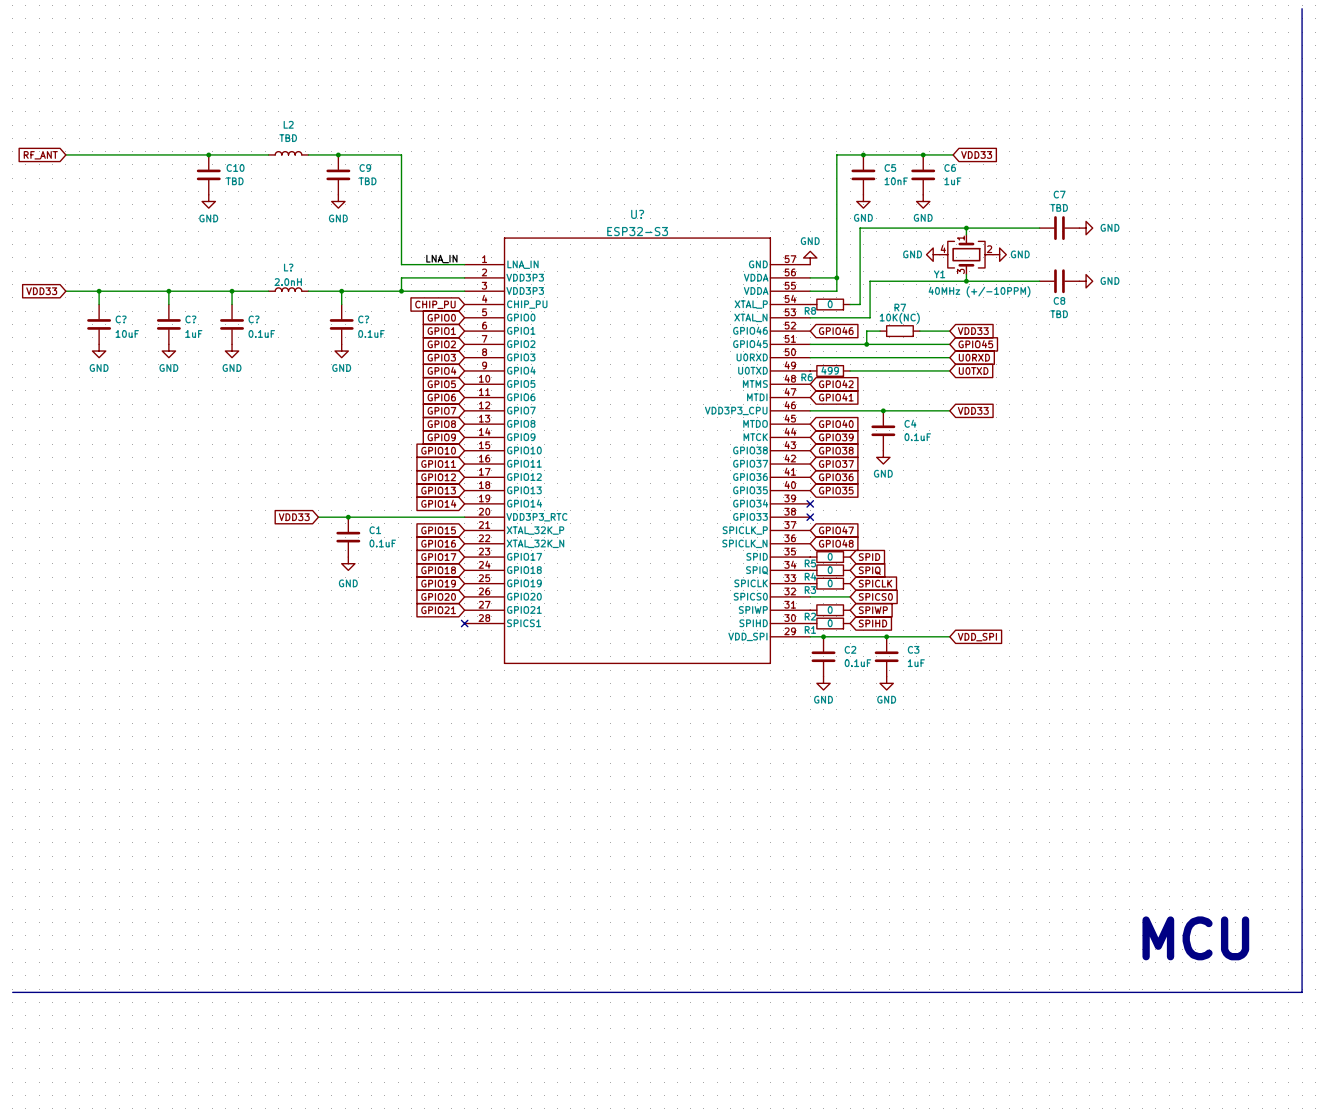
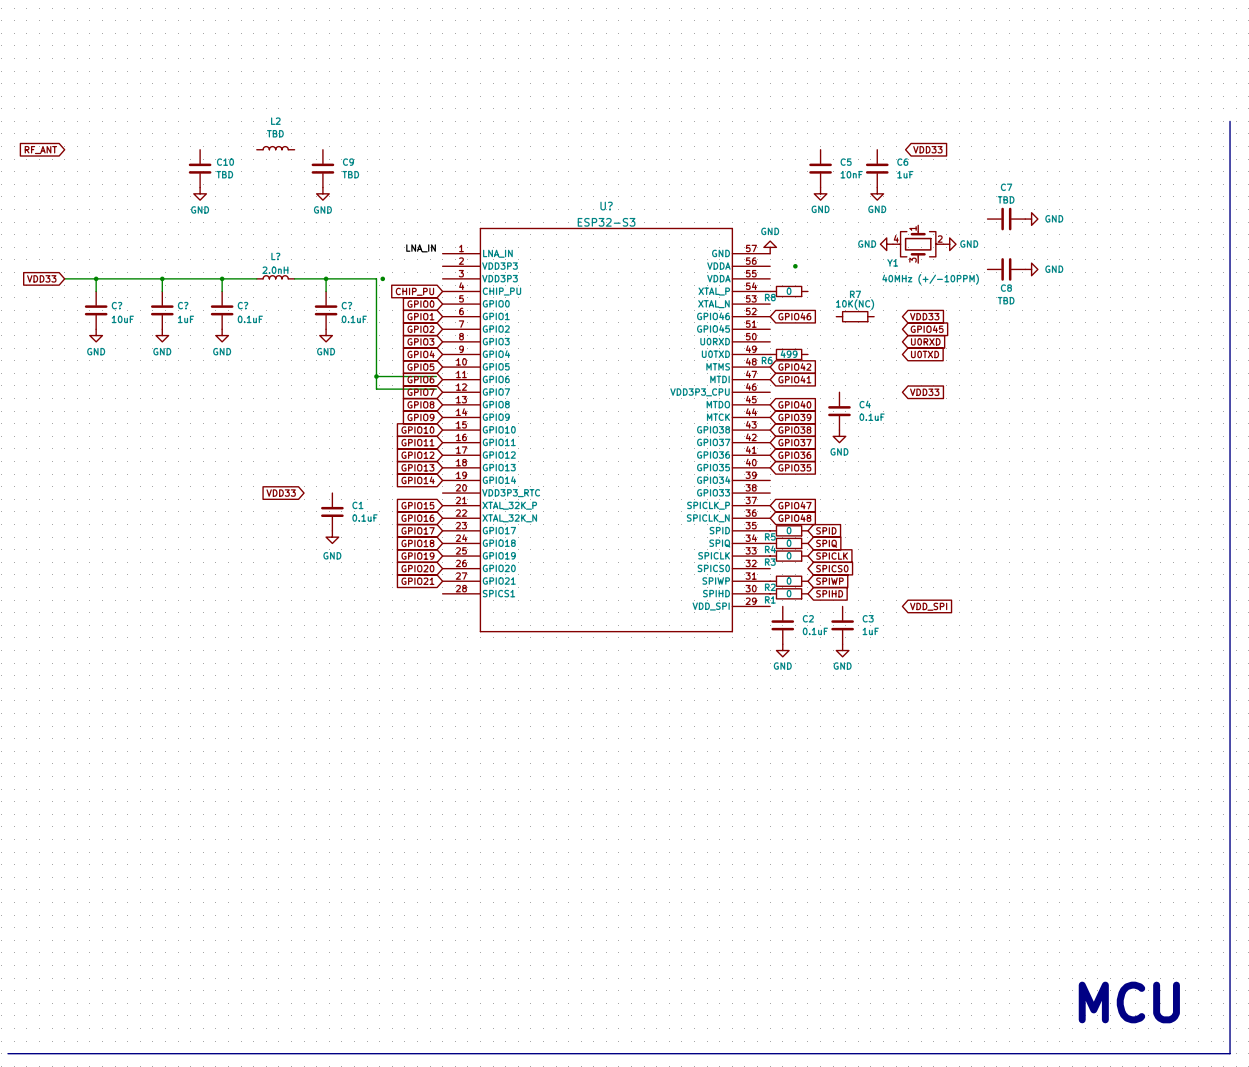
line: (1302, 8) (1302, 992) (12, 992) -> (1230, 121) (1230, 1053) (7, 1053)
wire: (65, 154) (268, 154) -> none
junction: (208, 154) -> none
wire: (308, 154) (401, 154) (401, 264) (464, 264) -> none
junction: (338, 154) -> none
junction: (863, 154) -> none
junction: (923, 154) -> none
wire: (953, 154) (836, 154) (836, 291) (810, 291) -> none
wire: (966, 228) (966, 234) -> none
junction: (966, 228) -> none
wire: (1039, 228) (860, 228) (860, 304) (850, 304) -> none
wire: (966, 274) (966, 281) -> none
wire: (464, 277) (401, 277) (401, 291) -> none
wire: (810, 277) (836, 277) -> none
junction: (966, 281) -> none
wire: (1039, 281) (870, 281) (870, 317) (810, 317) -> none
wire: (394, 291) (464, 291) -> (376, 278) (376, 389) (436, 389)
wire: (880, 331) (866, 331) (866, 344) -> none
wire: (919, 331) (949, 331) -> none
wire: (810, 344) (949, 344) -> none
junction: (866, 344) -> none
wire: (810, 357) (949, 357) -> none
wire: (850, 370) (949, 370) -> none
wire: none -> (376, 376) (436, 376)
junction: none -> (376, 376)
wire: (810, 410) (949, 410) -> none
junction: (883, 410) -> none
no-connect mark: (810, 503) -> none
wire: (318, 517) (464, 517) -> none
junction: (348, 517) -> none
no-connect mark: (810, 517) -> none
wire: (810, 596) (850, 596) -> none
no-connect mark: (464, 623) -> none
wire: (810, 636) (949, 636) -> none
junction: (823, 636) -> none
junction: (886, 636) -> none
text position: MCU (1195, 938) -> MCU (1129, 1002)

